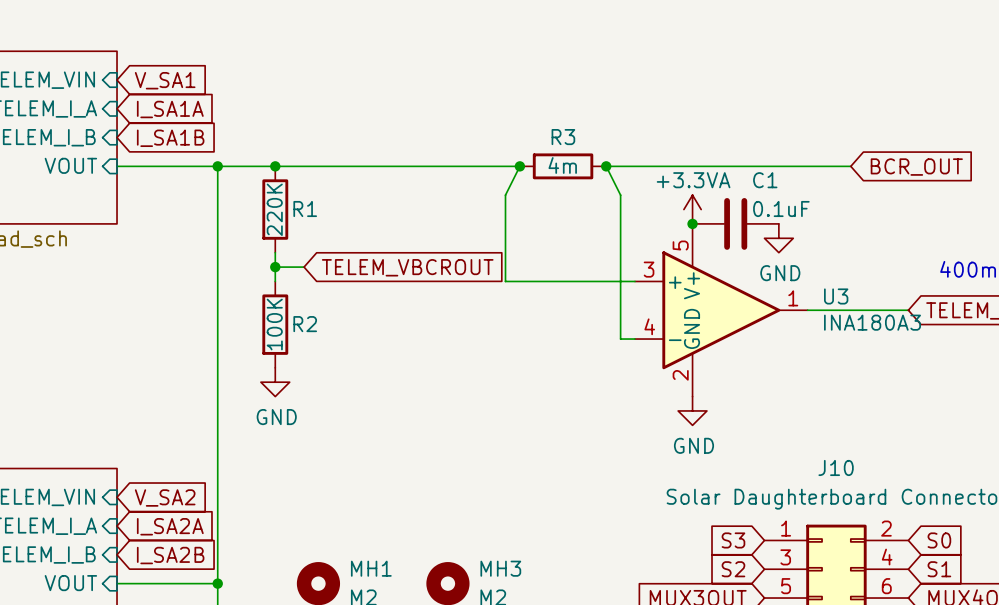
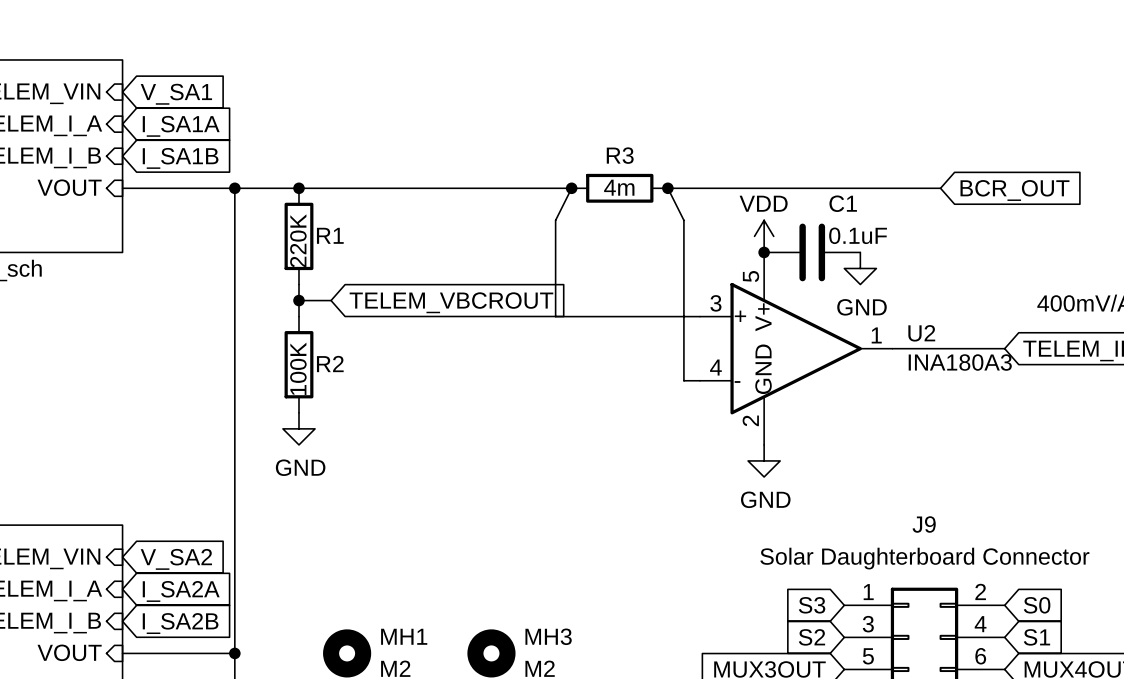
power symbol: +3.3VA (692, 209) -> VDD (764, 236)
U3 name: U3 (836, 296) -> U2 (921, 333)
J10 name: J10 (836, 467) -> J9 (924, 524)

